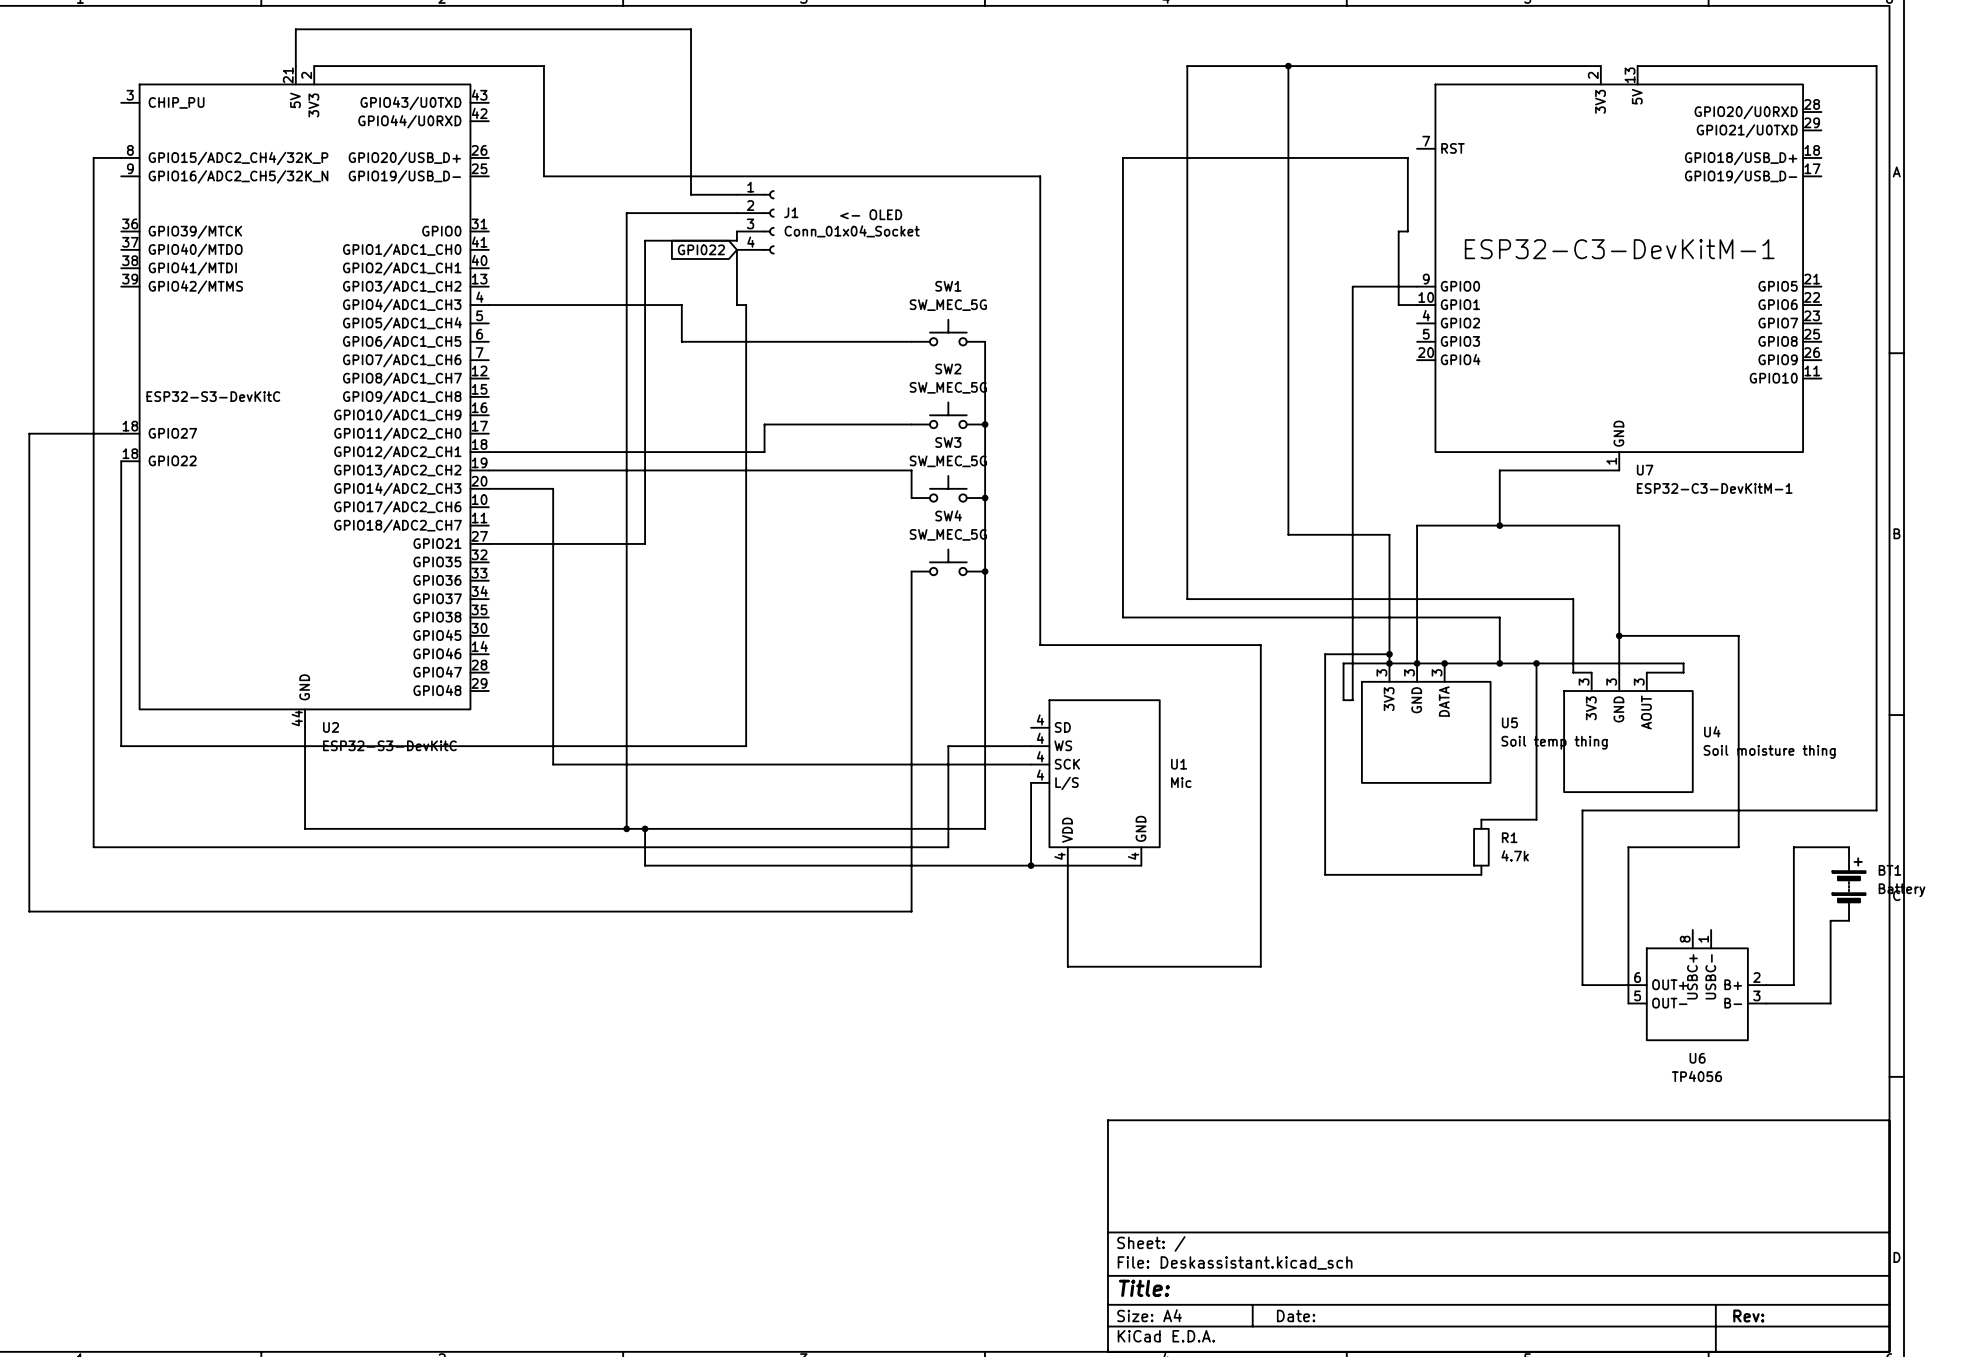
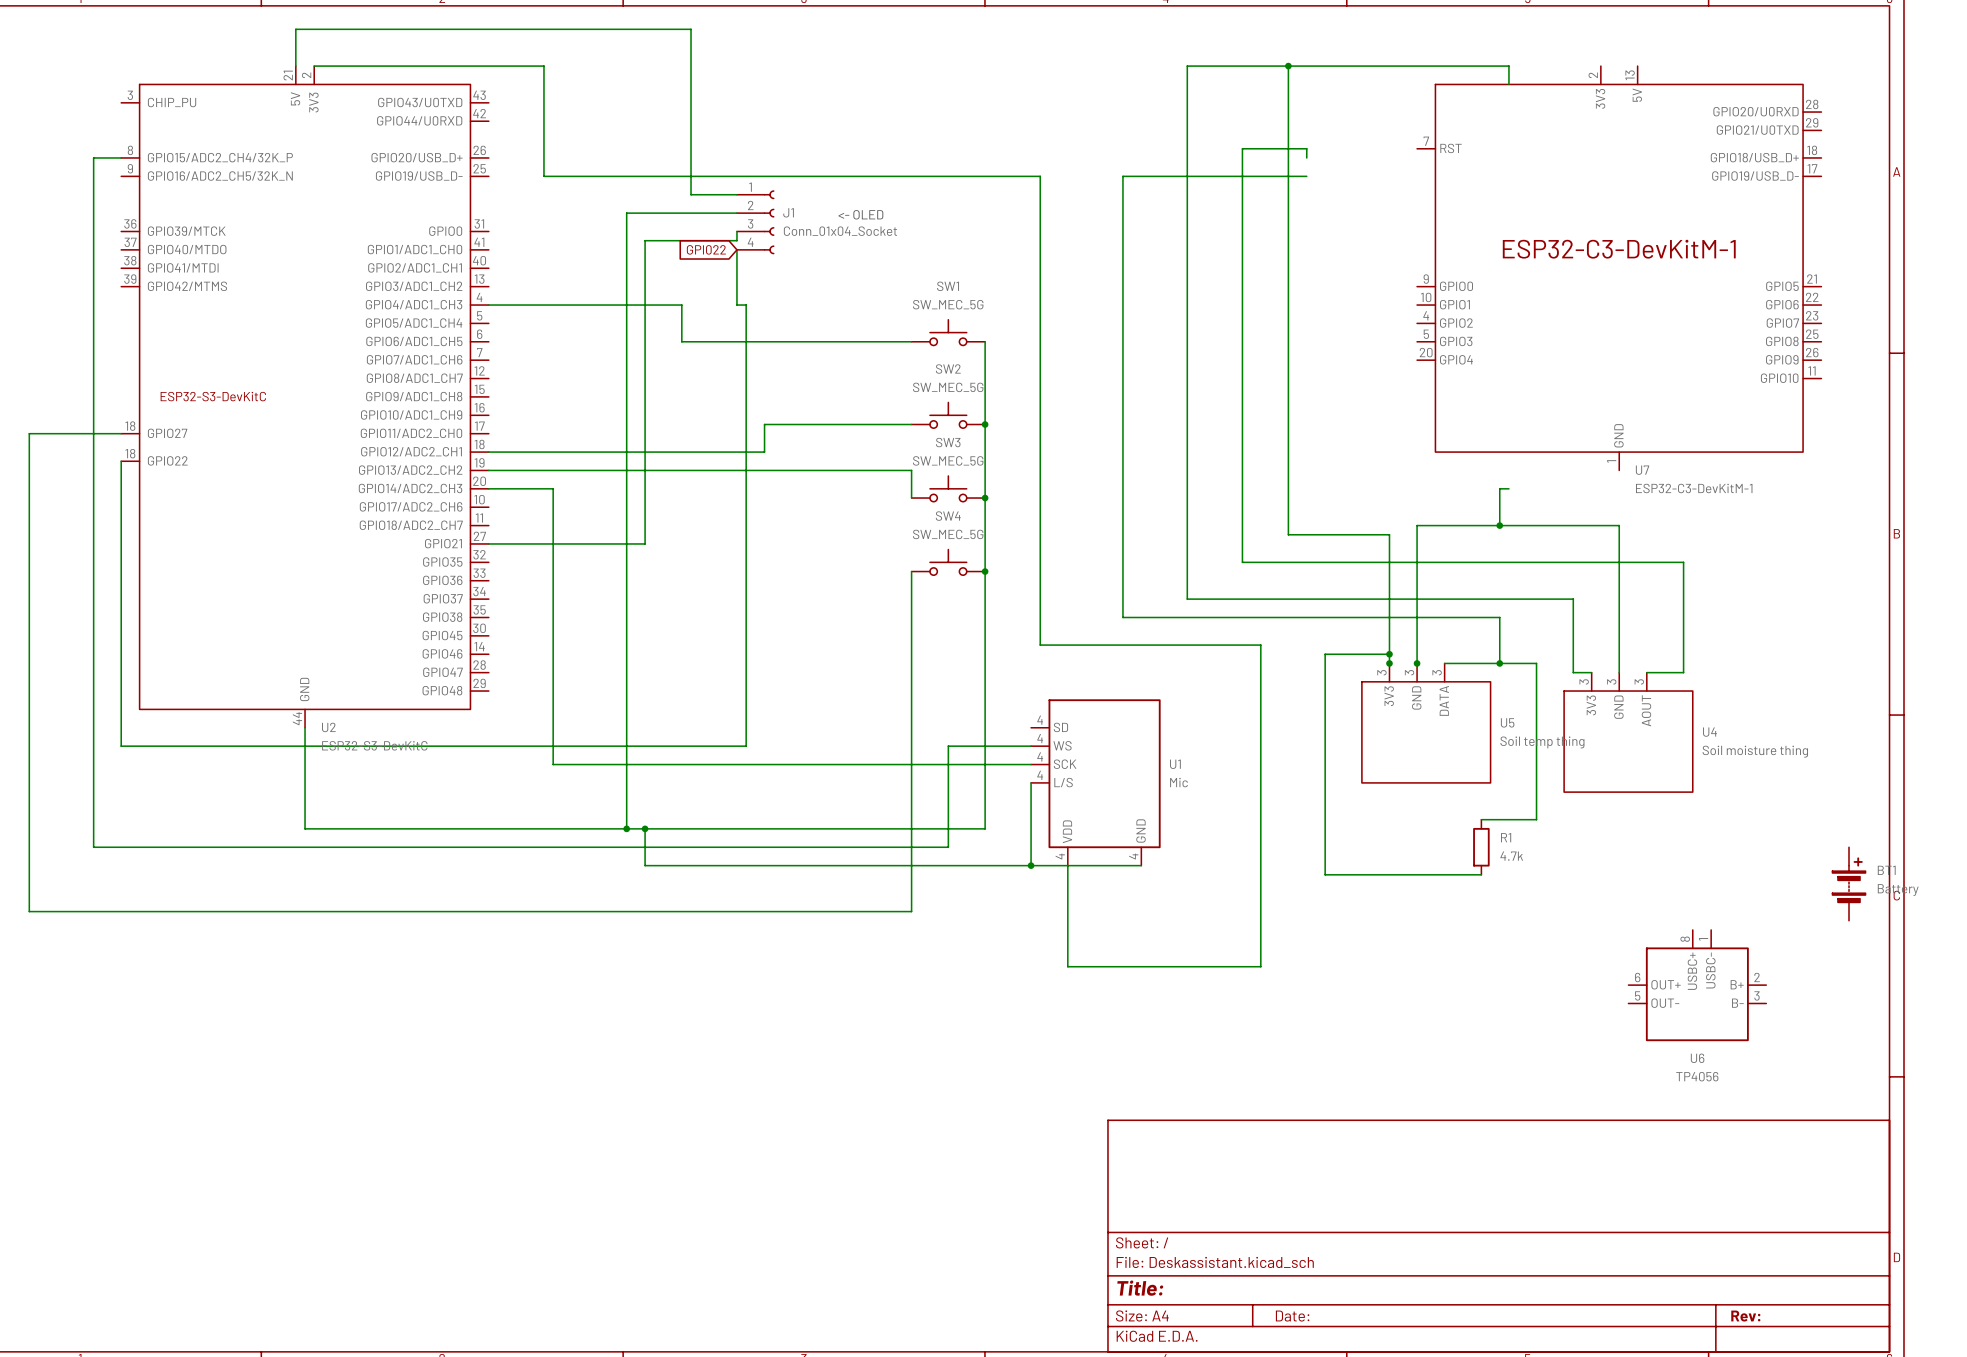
wire: (1508, 66) (1600, 66) -> (1508, 66) (1508, 84)
wire: (1637, 66) (1876, 66) (1876, 810) (1582, 810) (1582, 985) (1628, 985) -> none
wire: (1122, 176) (1122, 157) (1407, 157) (1407, 231) (1398, 231) (1398, 305) (1417, 305) -> (1122, 176) (1306, 176)
wire: (1417, 286) (1352, 286) (1352, 700) (1343, 700) (1343, 663) (1444, 663) -> none
wire: (1619, 470) (1499, 470) (1499, 488) -> (1508, 488) (1499, 488)
wire: (1619, 635) (1738, 635) (1738, 847) (1628, 847) (1628, 1003) -> none
junction: (1619, 635) -> none
junction: (1444, 663) -> none
wire: (1536, 663) (1683, 663) -> (1306, 157) (1306, 148) (1242, 148) (1242, 562) (1683, 562) (1683, 663)
junction: (1536, 663) -> none
wire: (1849, 847) (1793, 847) (1793, 985) (1766, 985) -> none
wire: (1849, 920) (1830, 920) (1830, 1003) (1766, 1003) -> none

